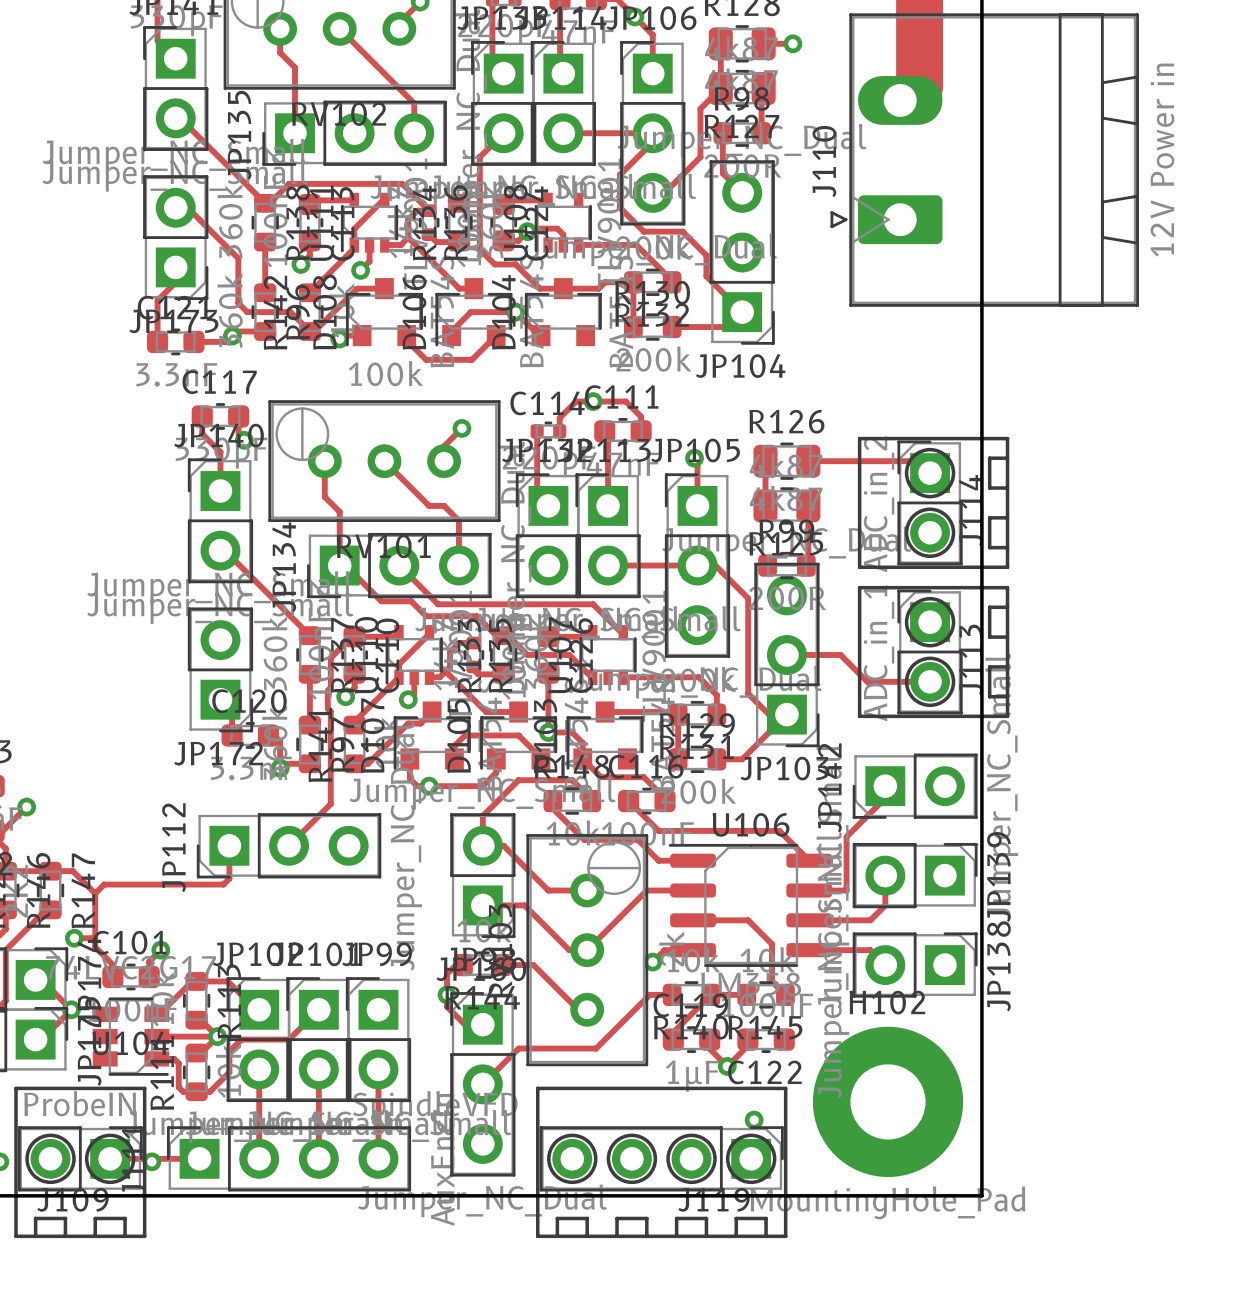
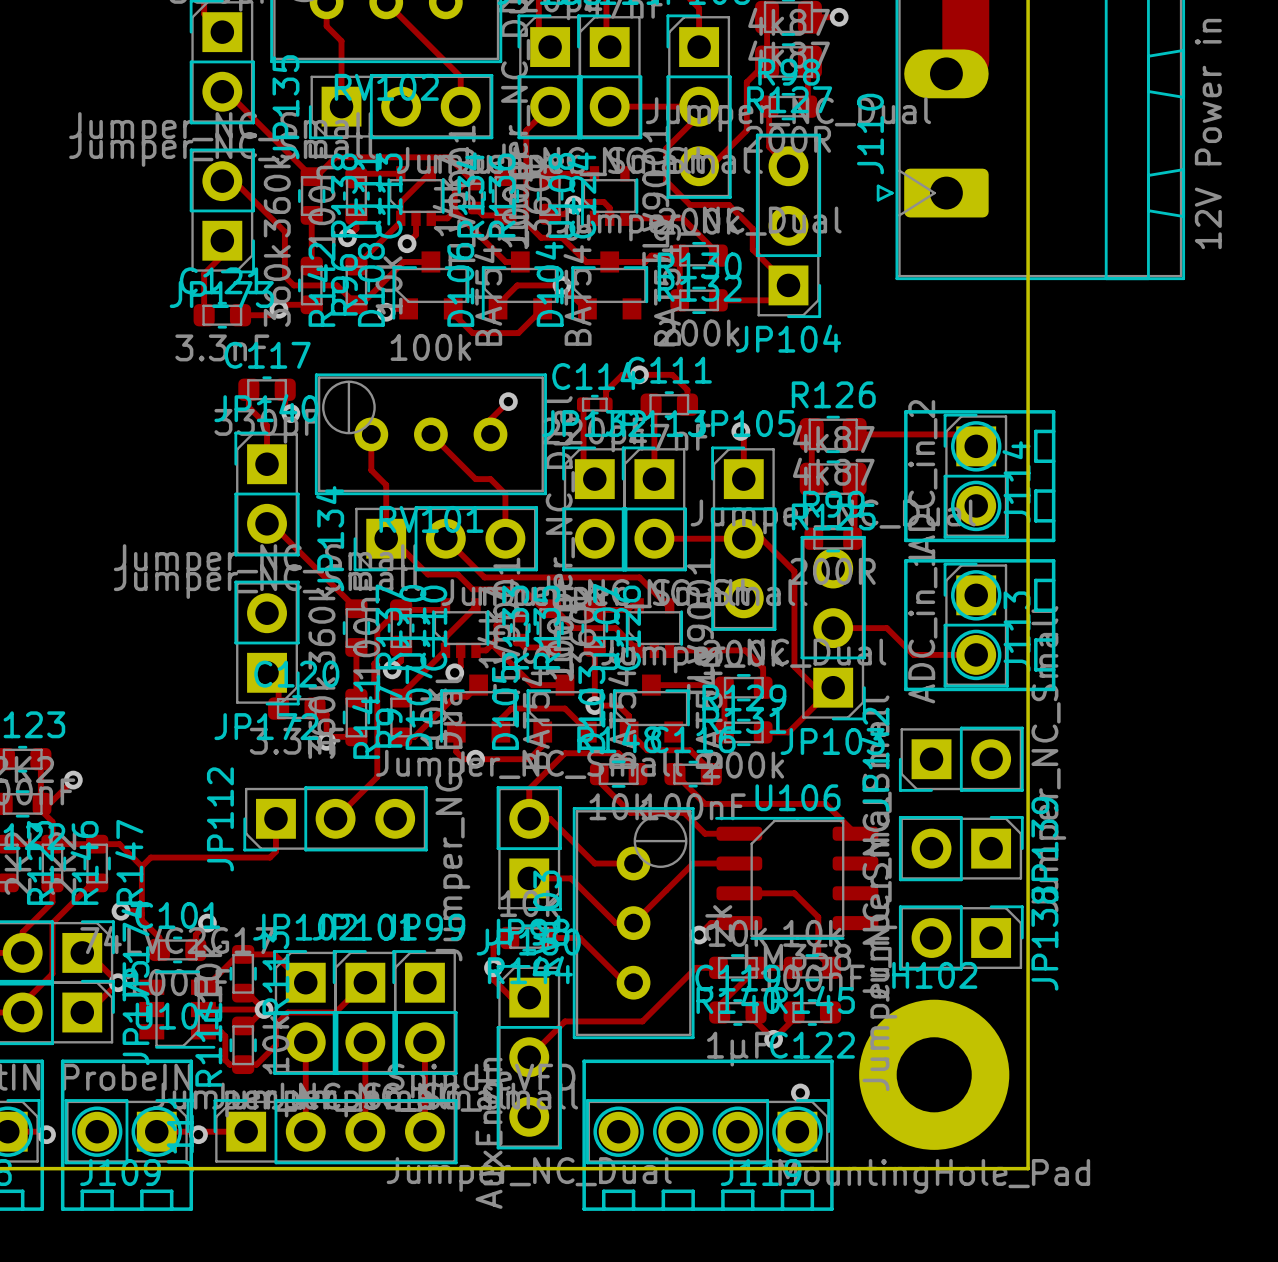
track: (885, 786) (885, 798) (846, 836) (846, 890) (809, 890) -> none
track: (885, 875) (885, 905) (870, 920) (809, 920) -> none
track: (809, 950) (870, 950) (885, 965) -> none

